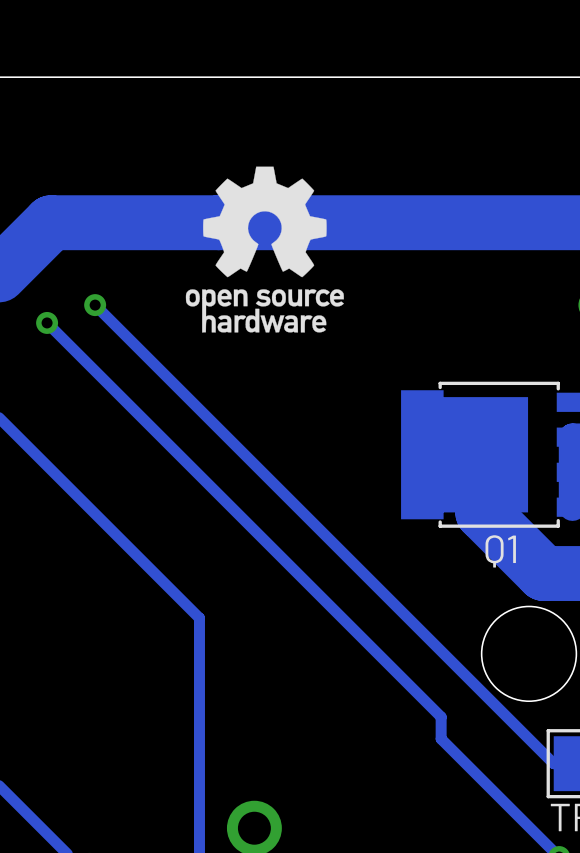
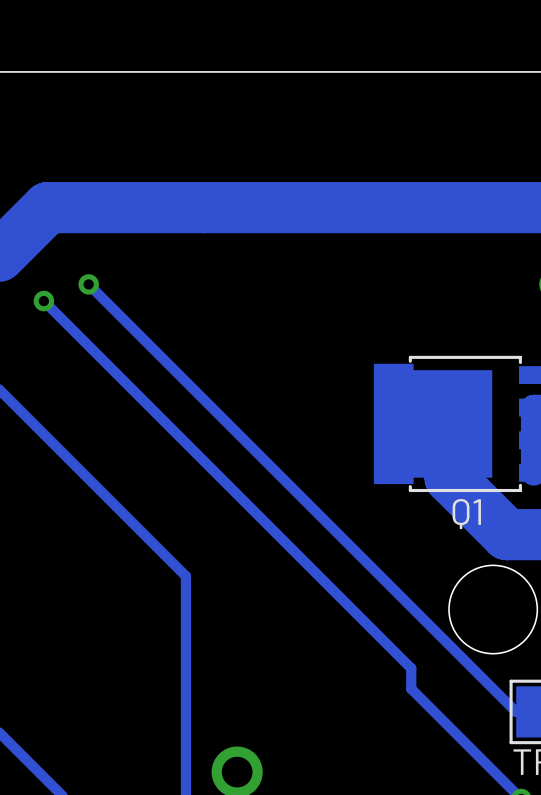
drawing: [185, 166, 344, 333] -> none

